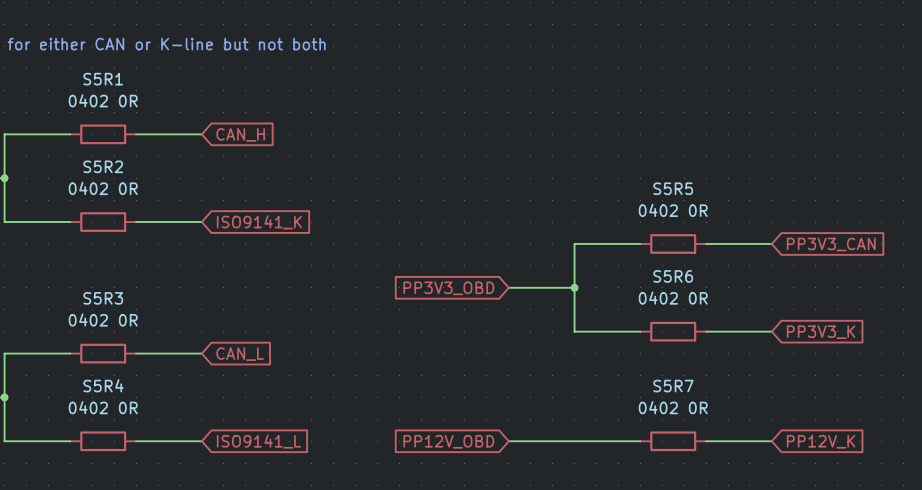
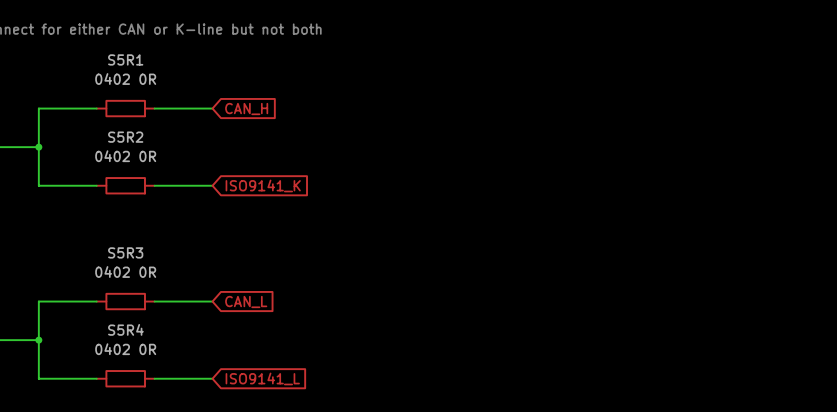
wire: (640, 243) (574, 243) (574, 331) (640, 331) -> none
S5R5: 0402 0R (673, 243) -> none
wire: (706, 243) (771, 243) -> none
global label: PP3V3_CAN (831, 244) -> none
wire: (508, 287) (574, 287) -> none
junction: (574, 287) -> none
global label: PP3V3_OBD (448, 288) -> none
S5R6: 0402 0R (673, 331) -> none
wire: (706, 331) (771, 331) -> none
global label: PP3V3_K (821, 332) -> none
global label: PP12V_OBD (448, 441) -> none
wire: (508, 441) (640, 441) -> none
S5R7: 0402 0R (673, 441) -> none
wire: (706, 441) (771, 441) -> none
global label: PP12V_K (821, 441) -> none

